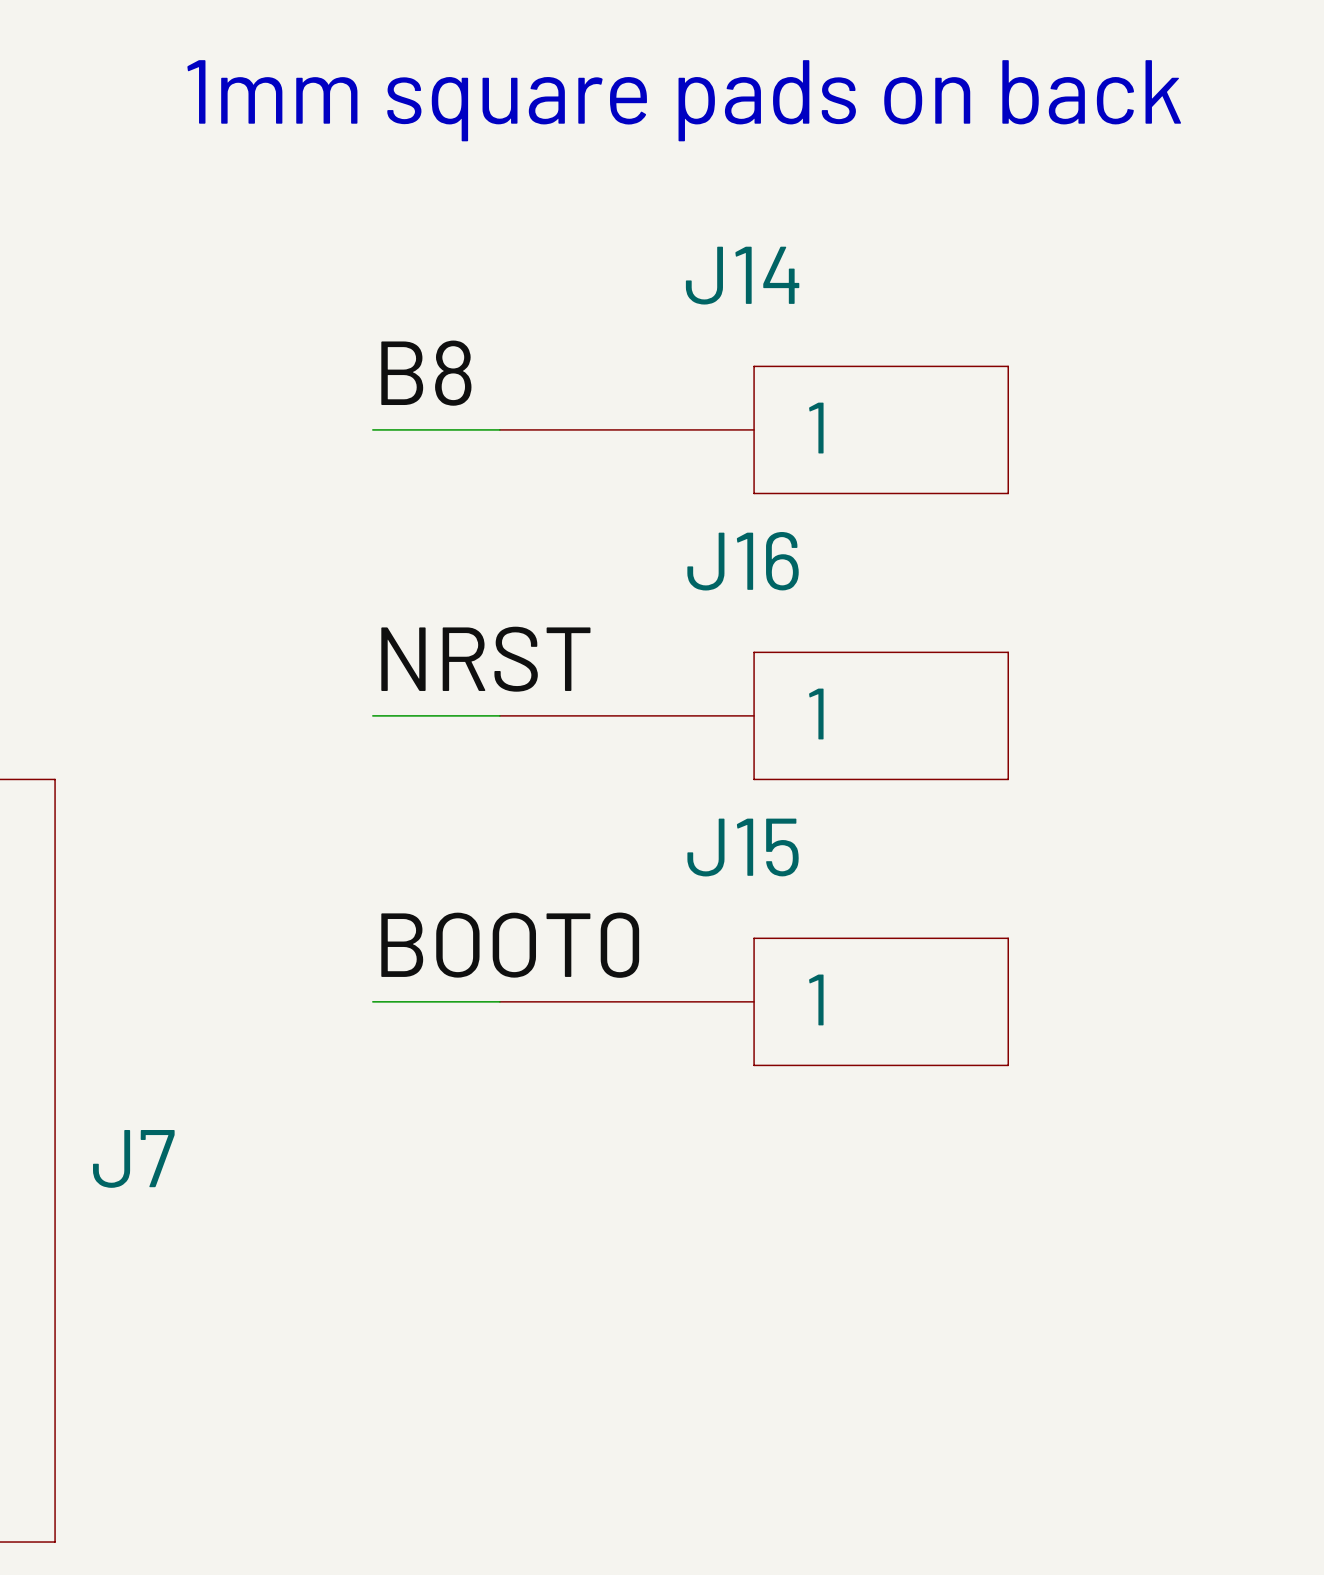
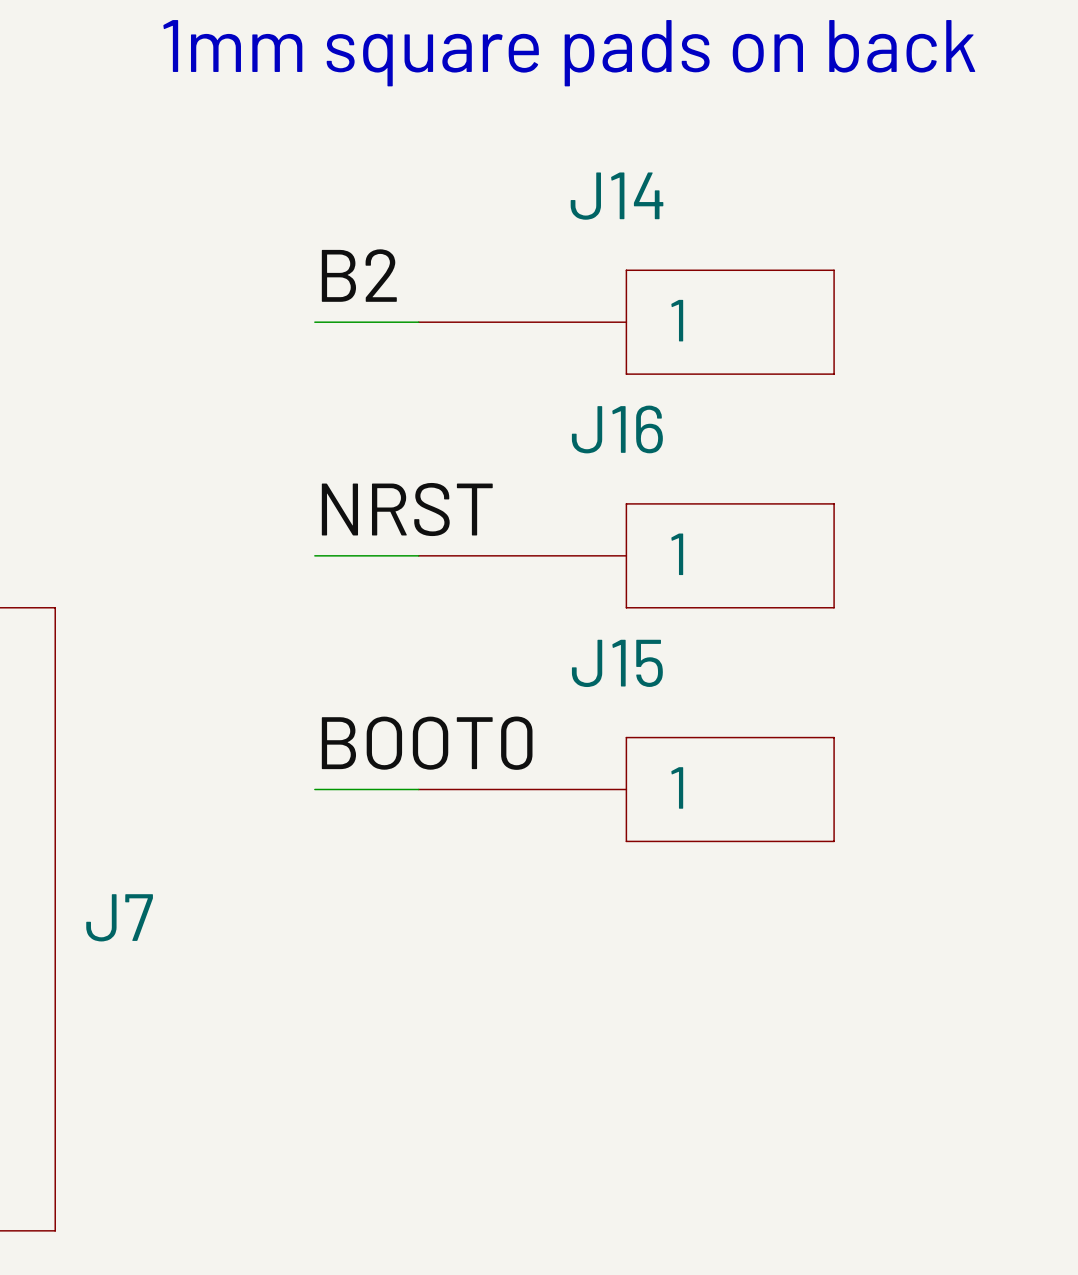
label: B8 (426, 373) -> B2 (359, 275)

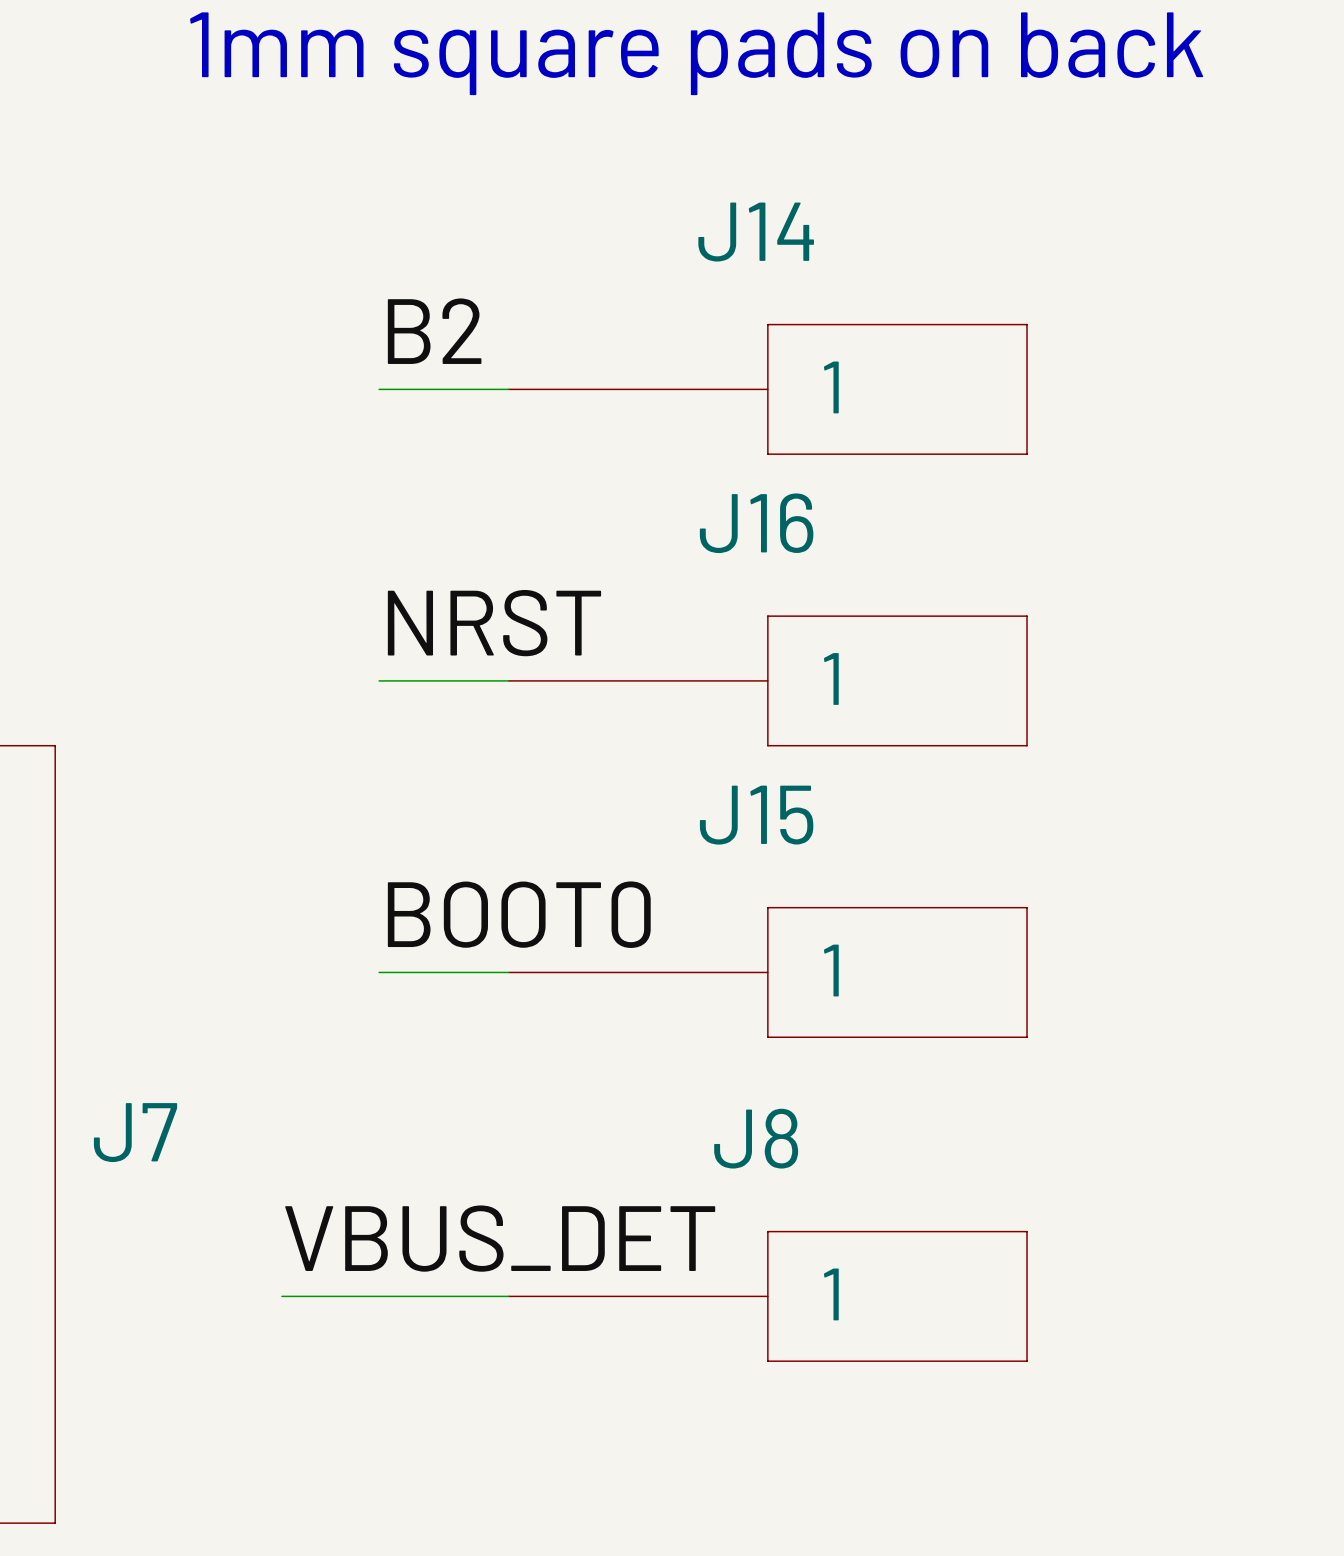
label: none -> VBUS_DET (500, 1238)
wire: none -> (281, 1296) (508, 1296)
J8: none -> (767, 1296)

